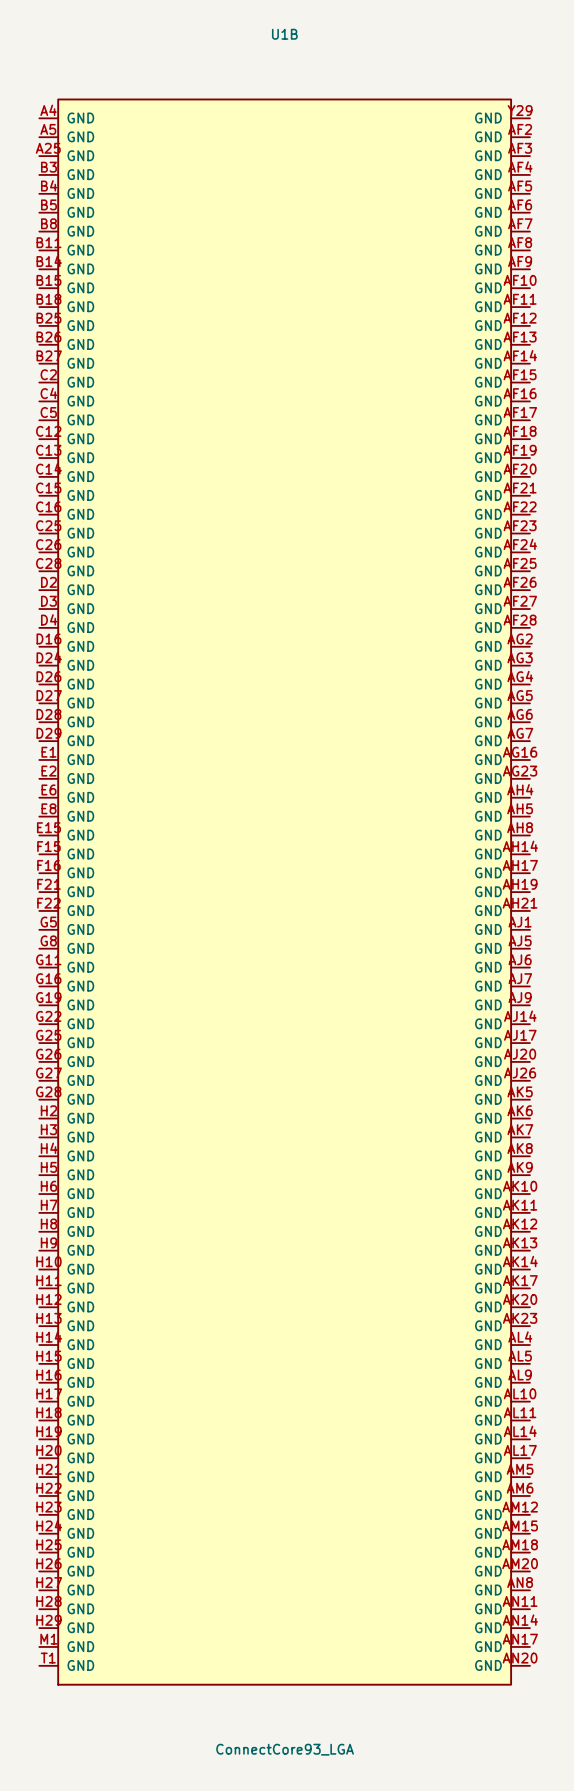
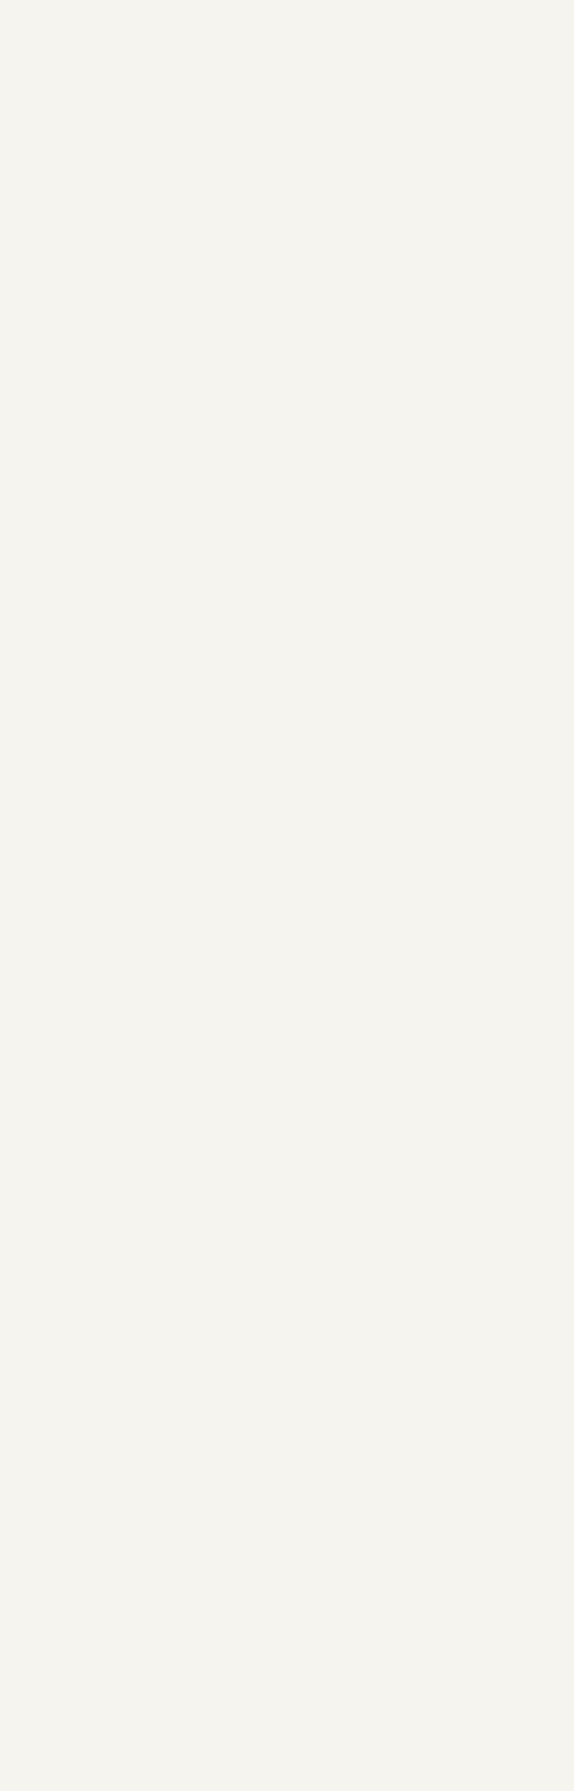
U1B: ConnectCore93_LGA (284, 892) -> none

